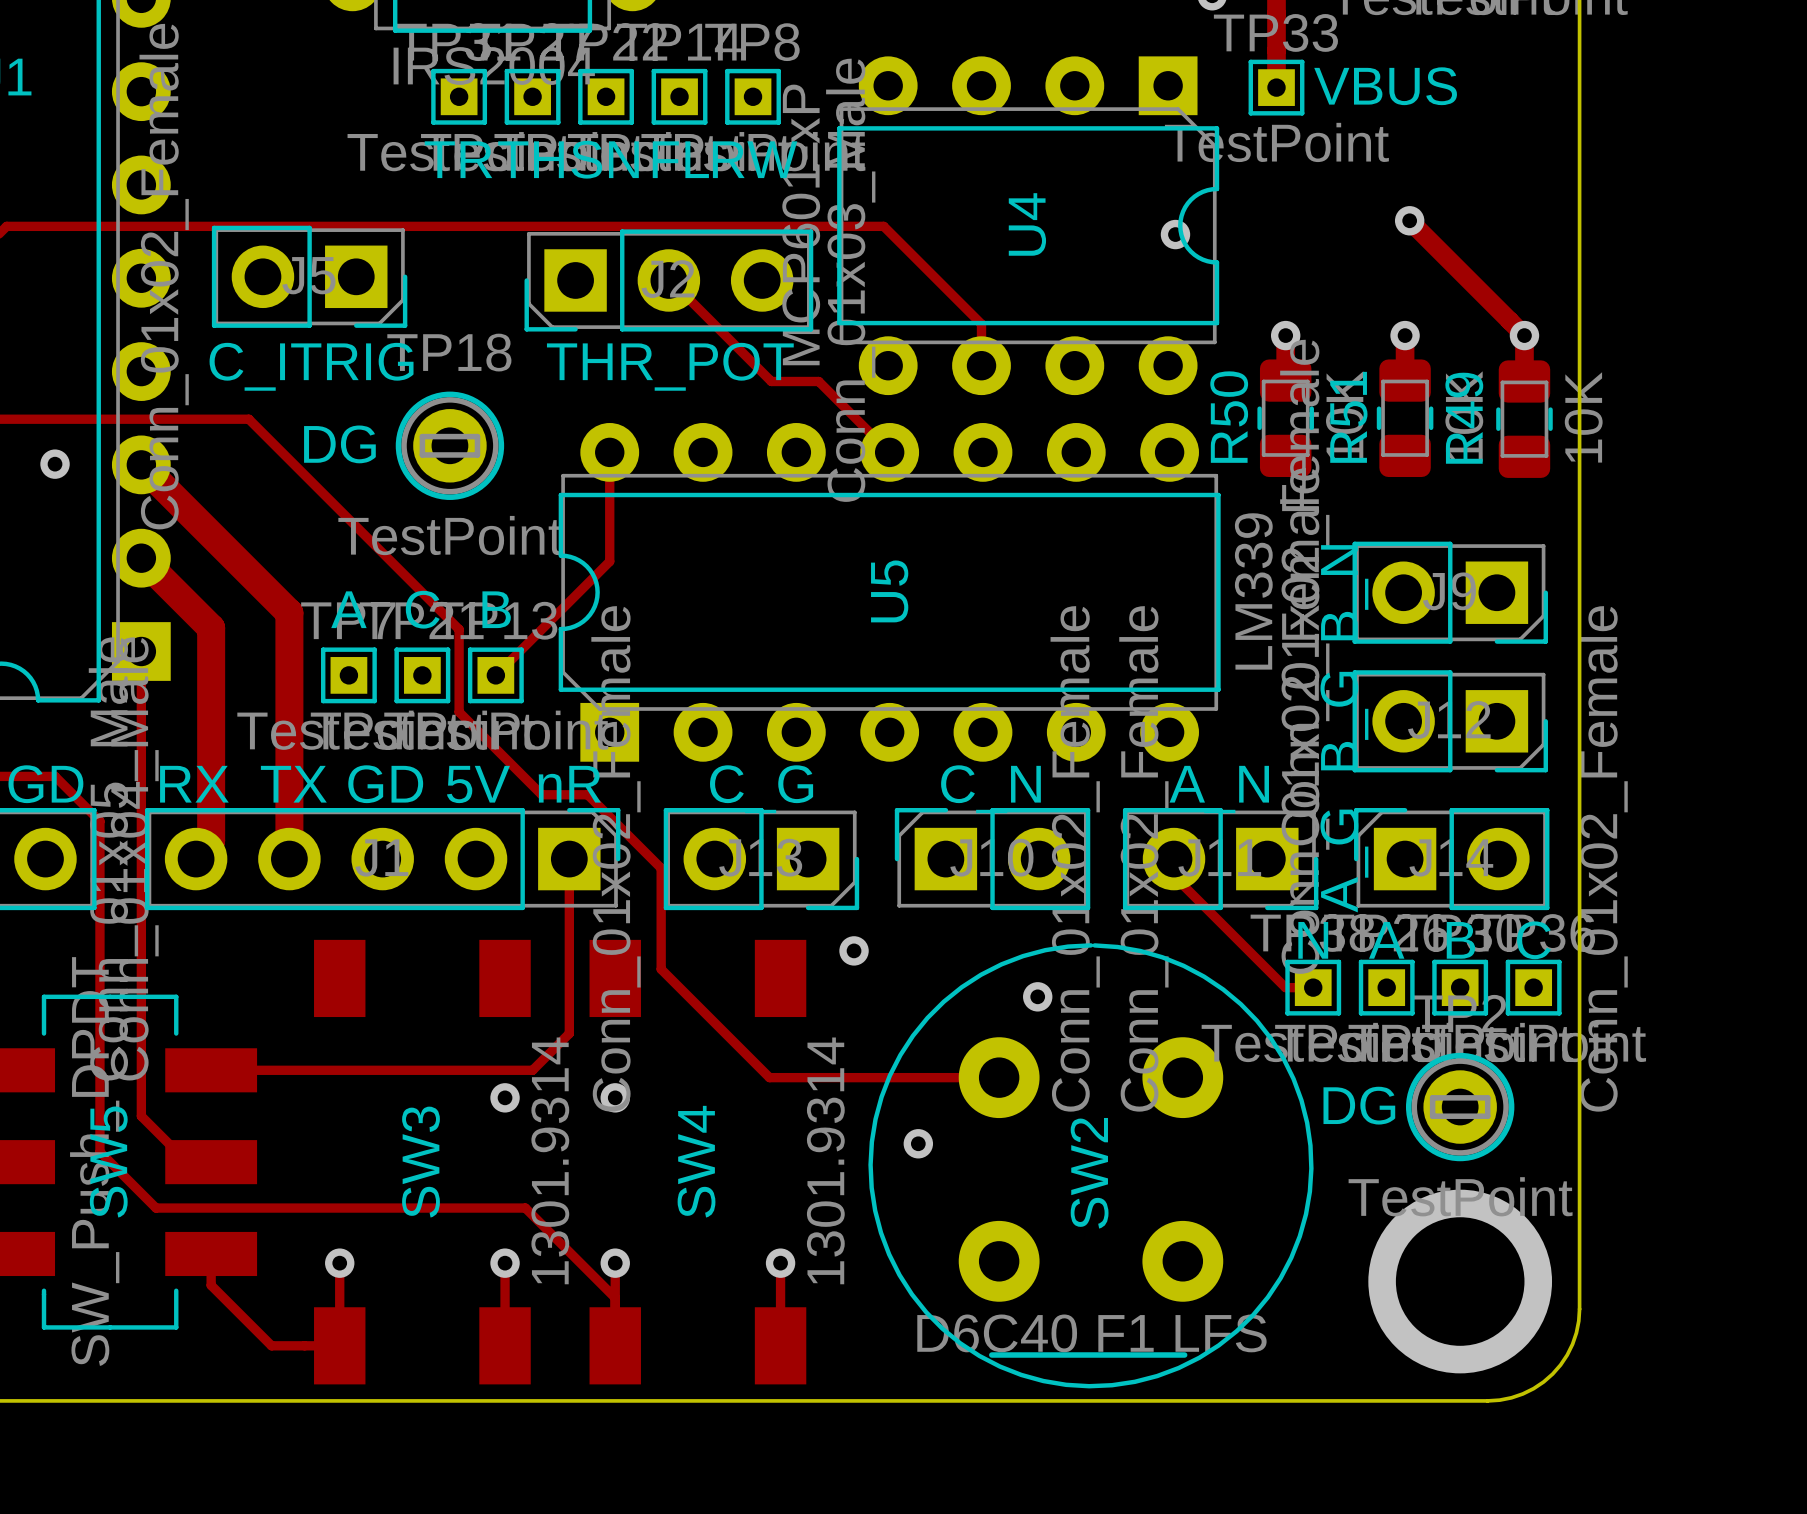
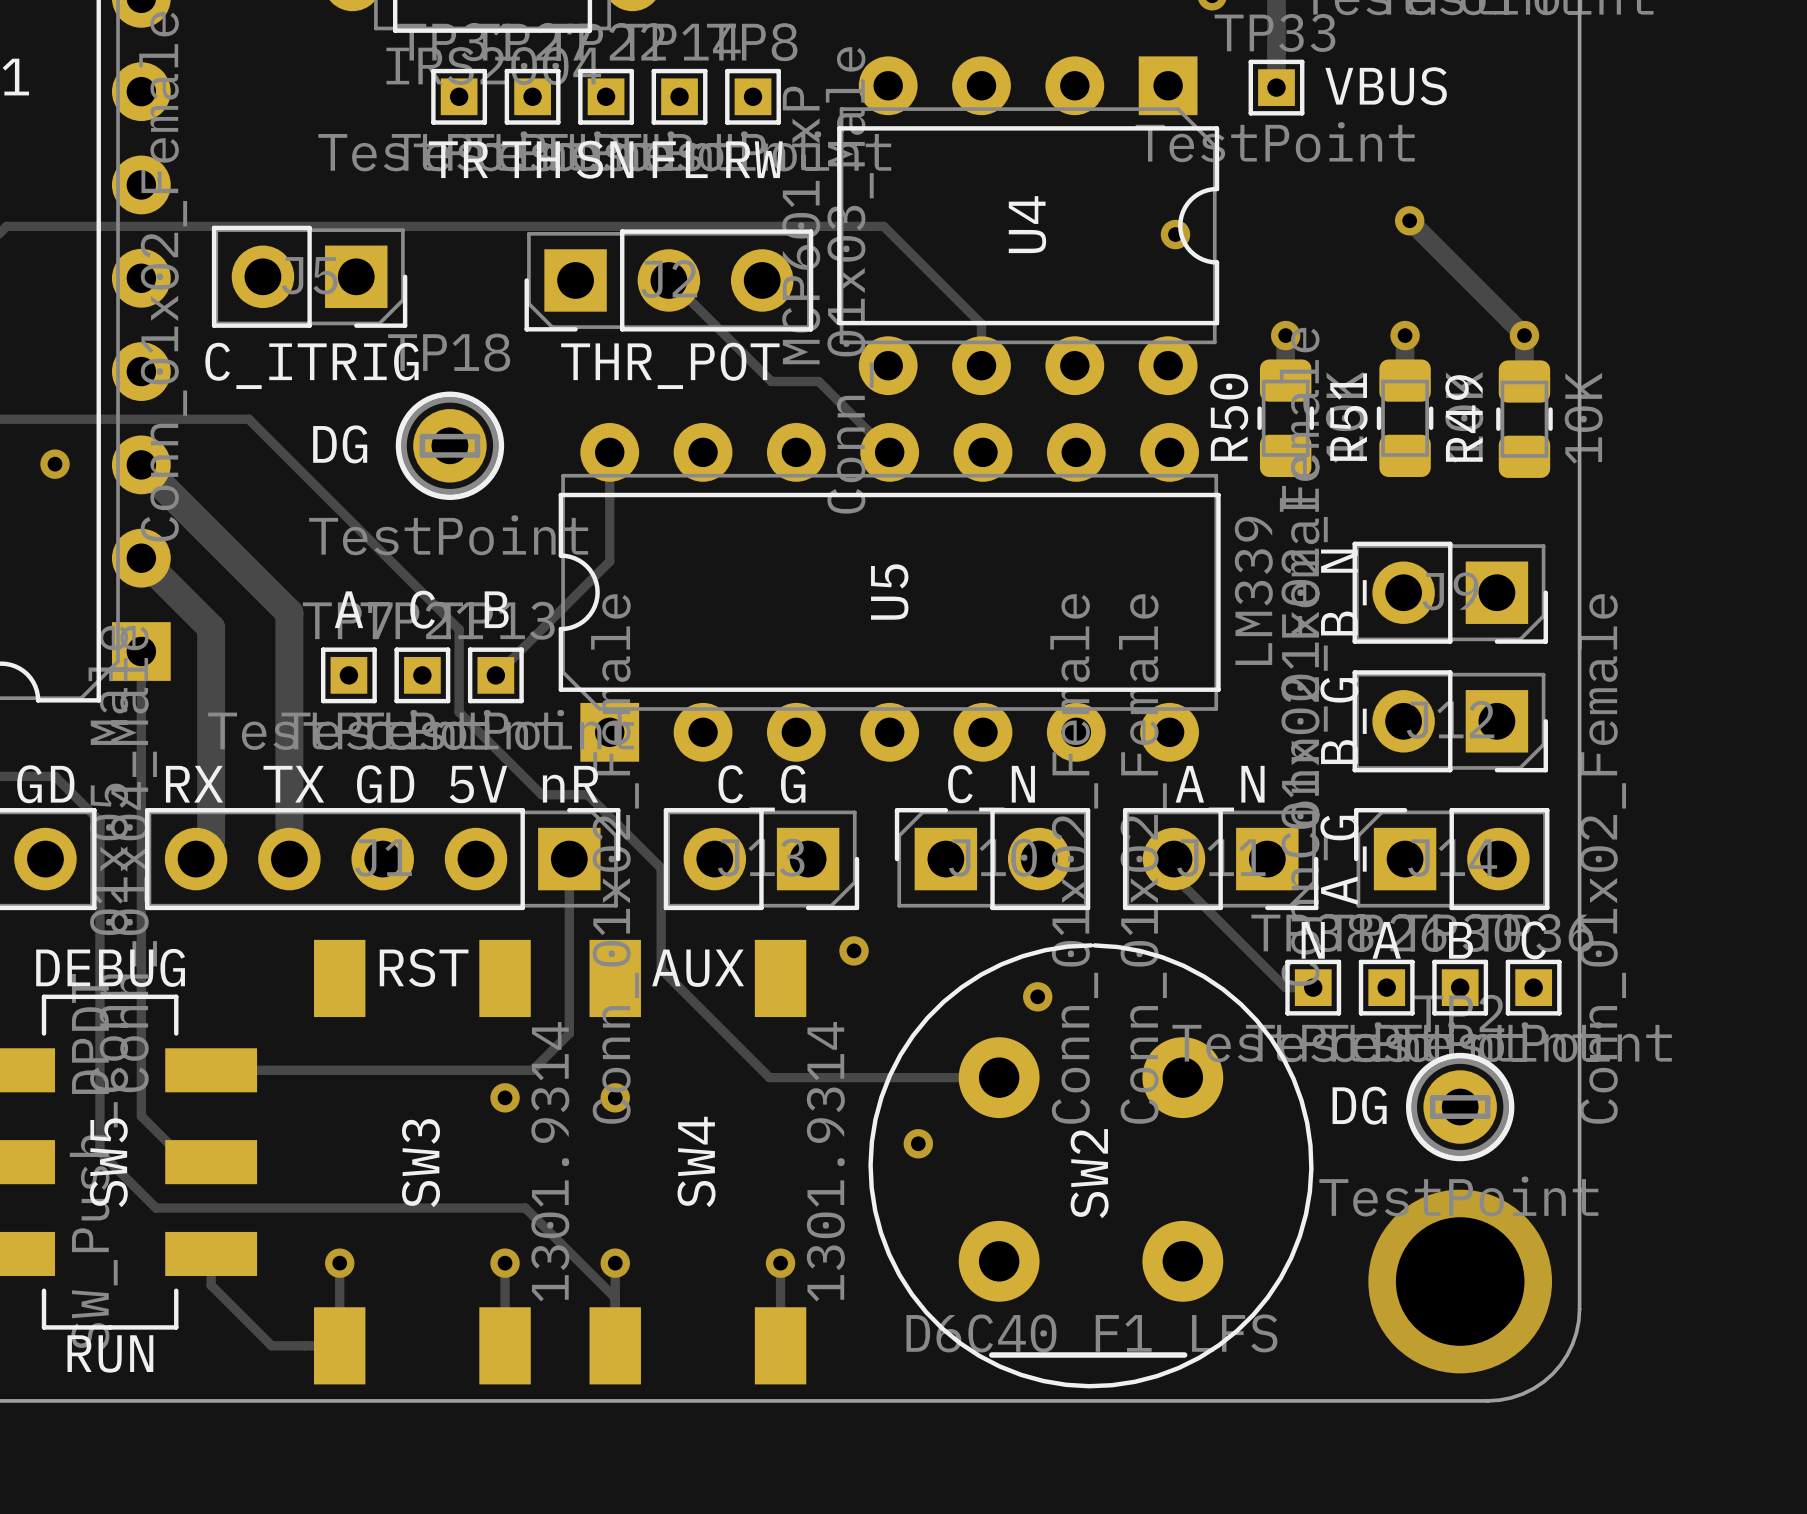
text: none -> DEBUG (110, 967)
text: none -> RST (424, 967)
text: none -> AUX (698, 968)
text: none -> RUN (110, 1353)

